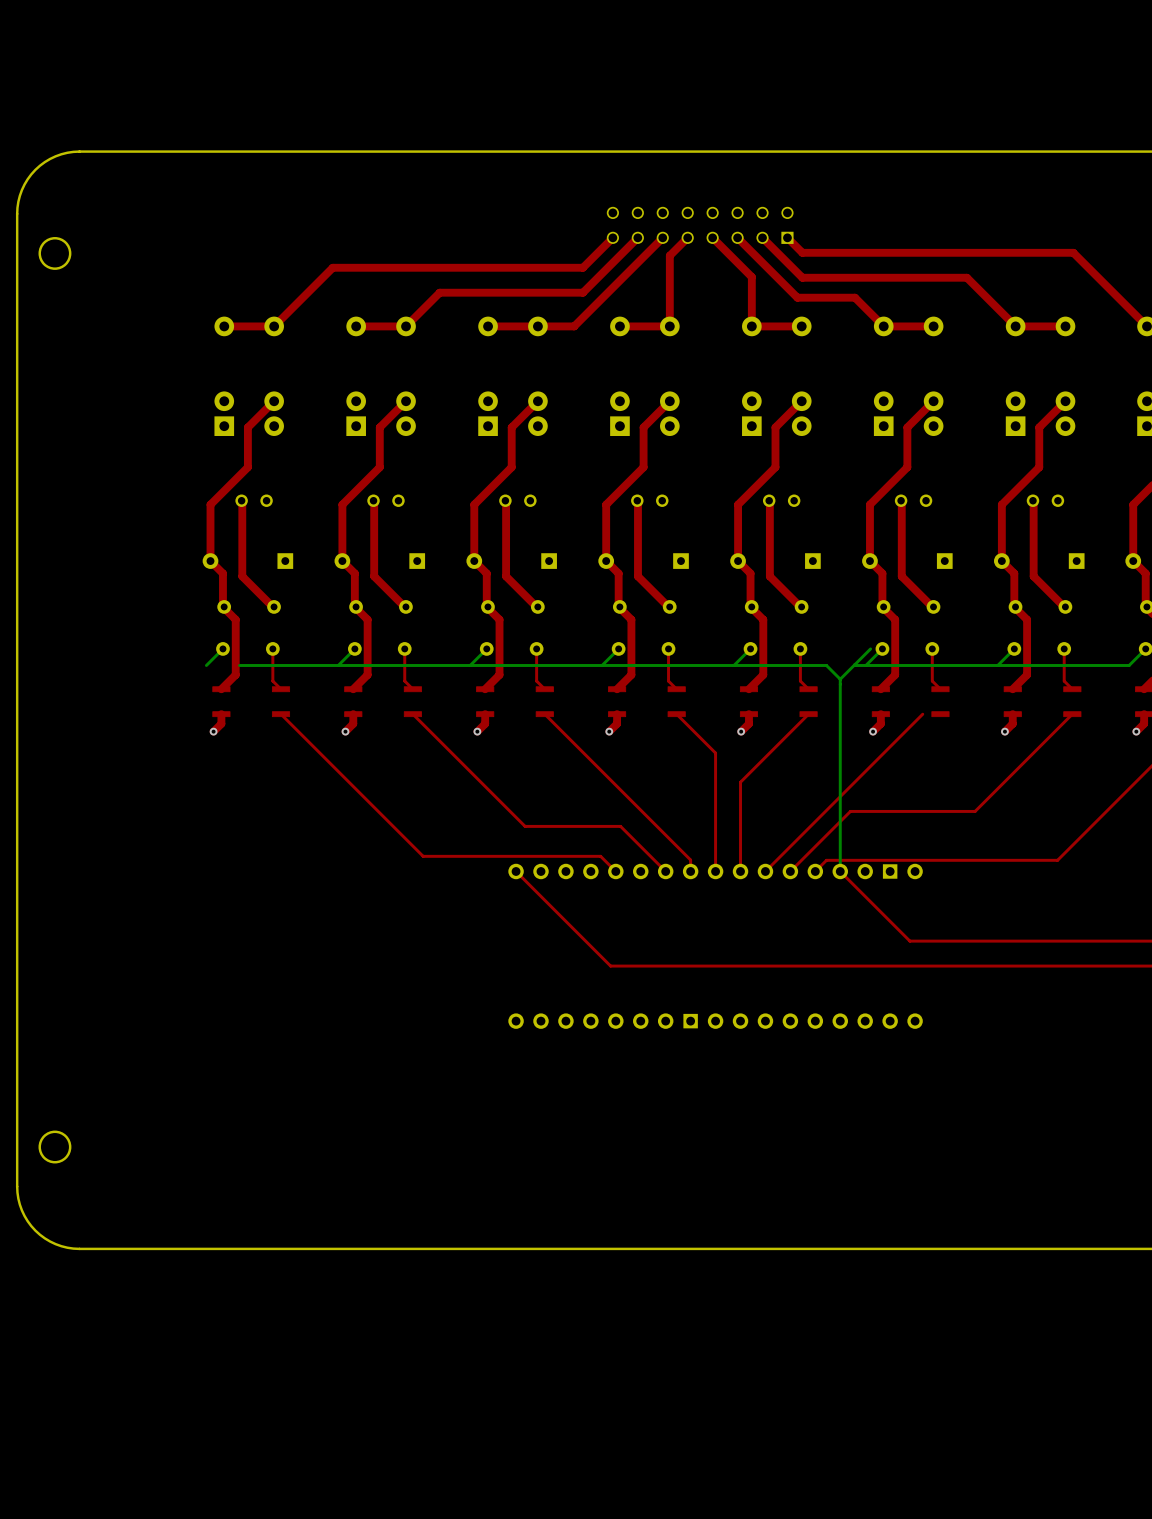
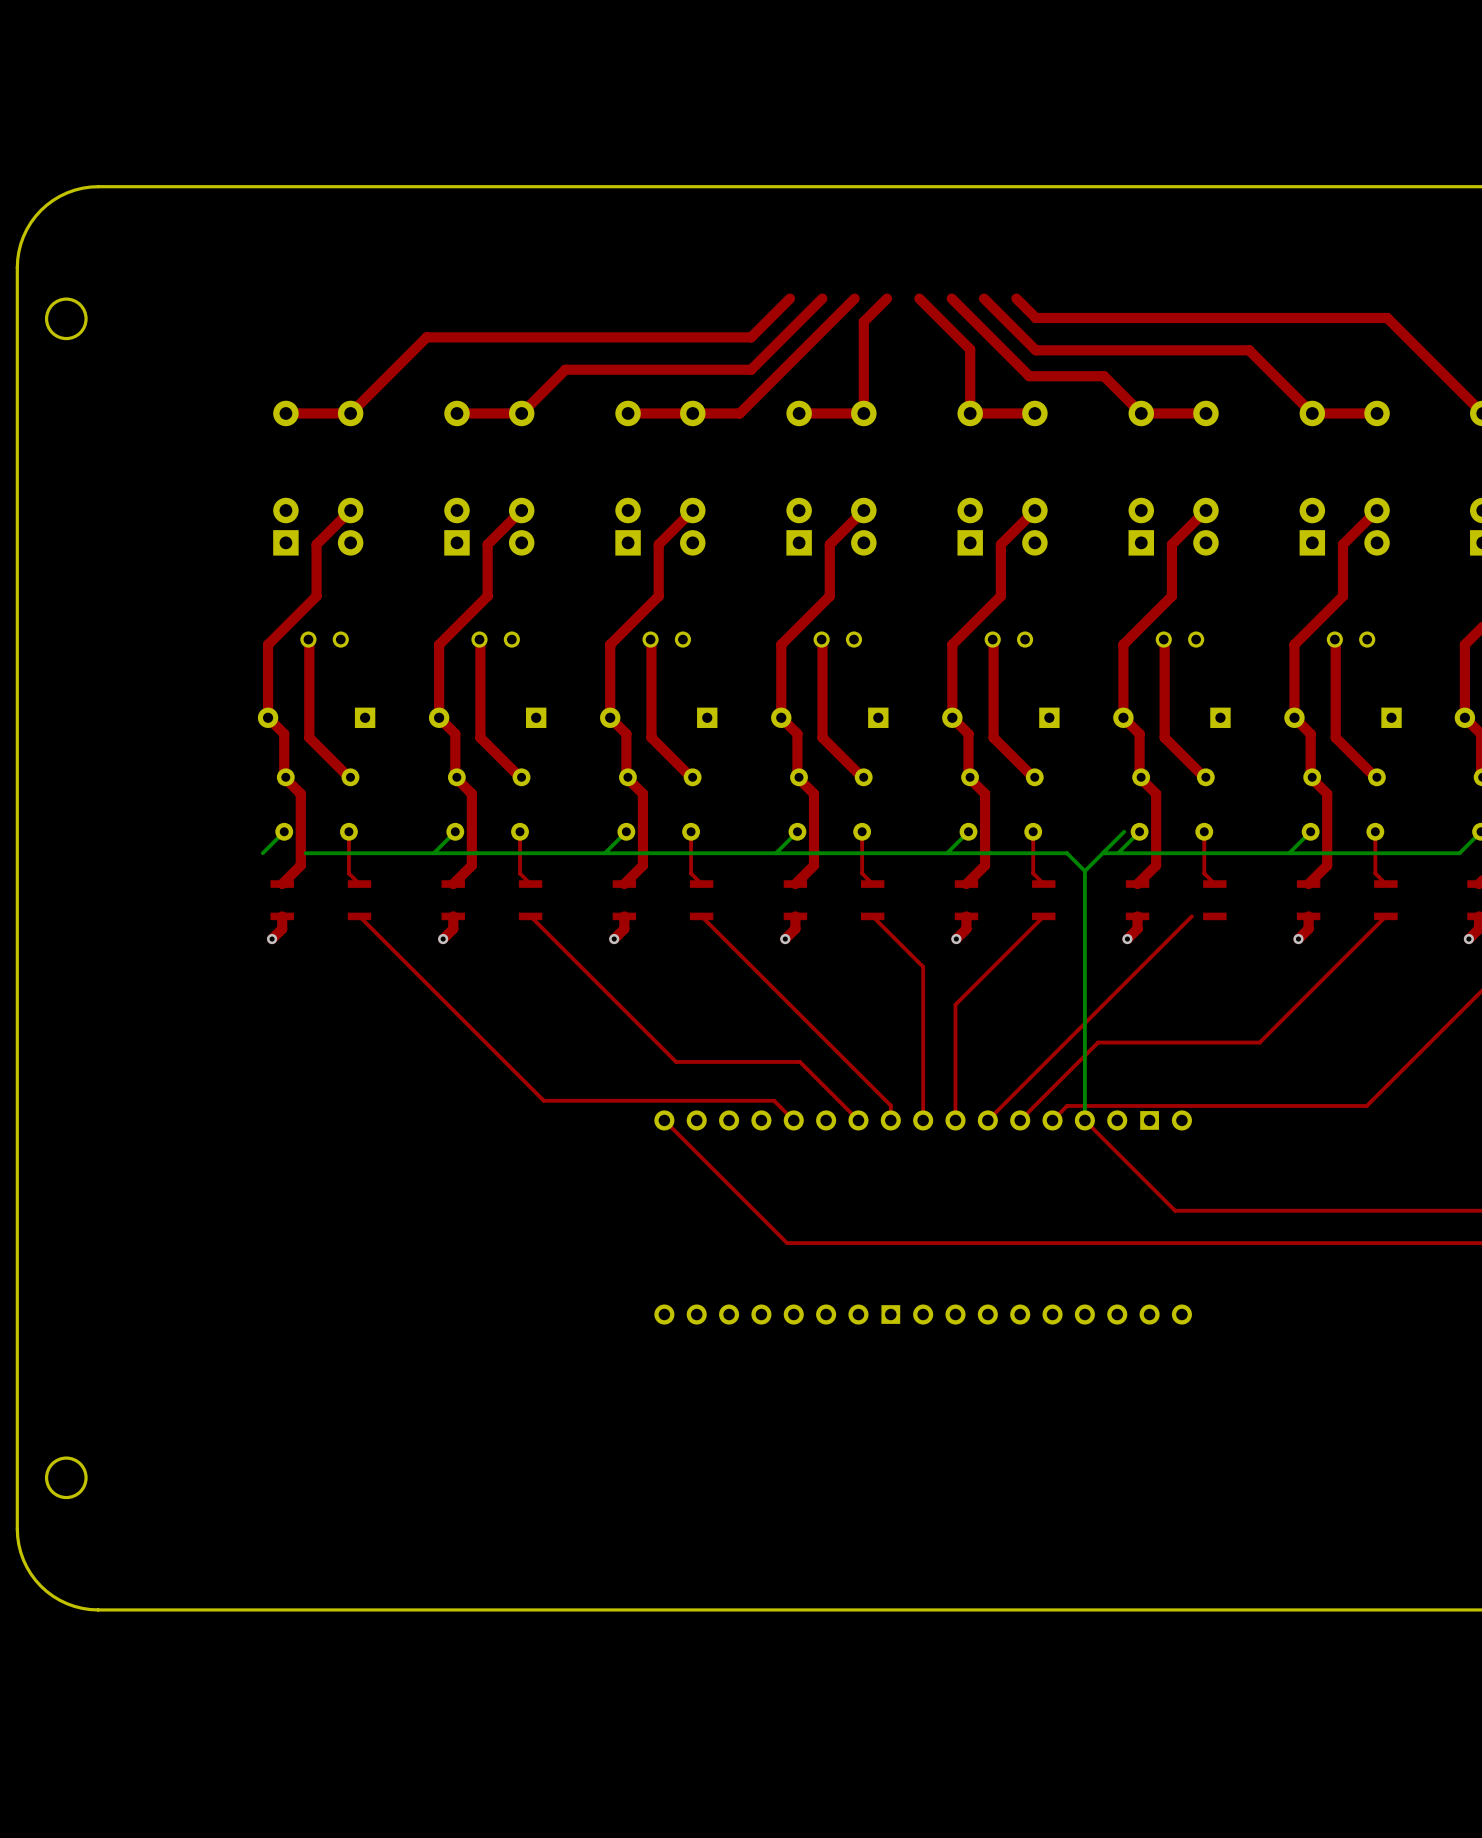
part: (700, 225) -> none

